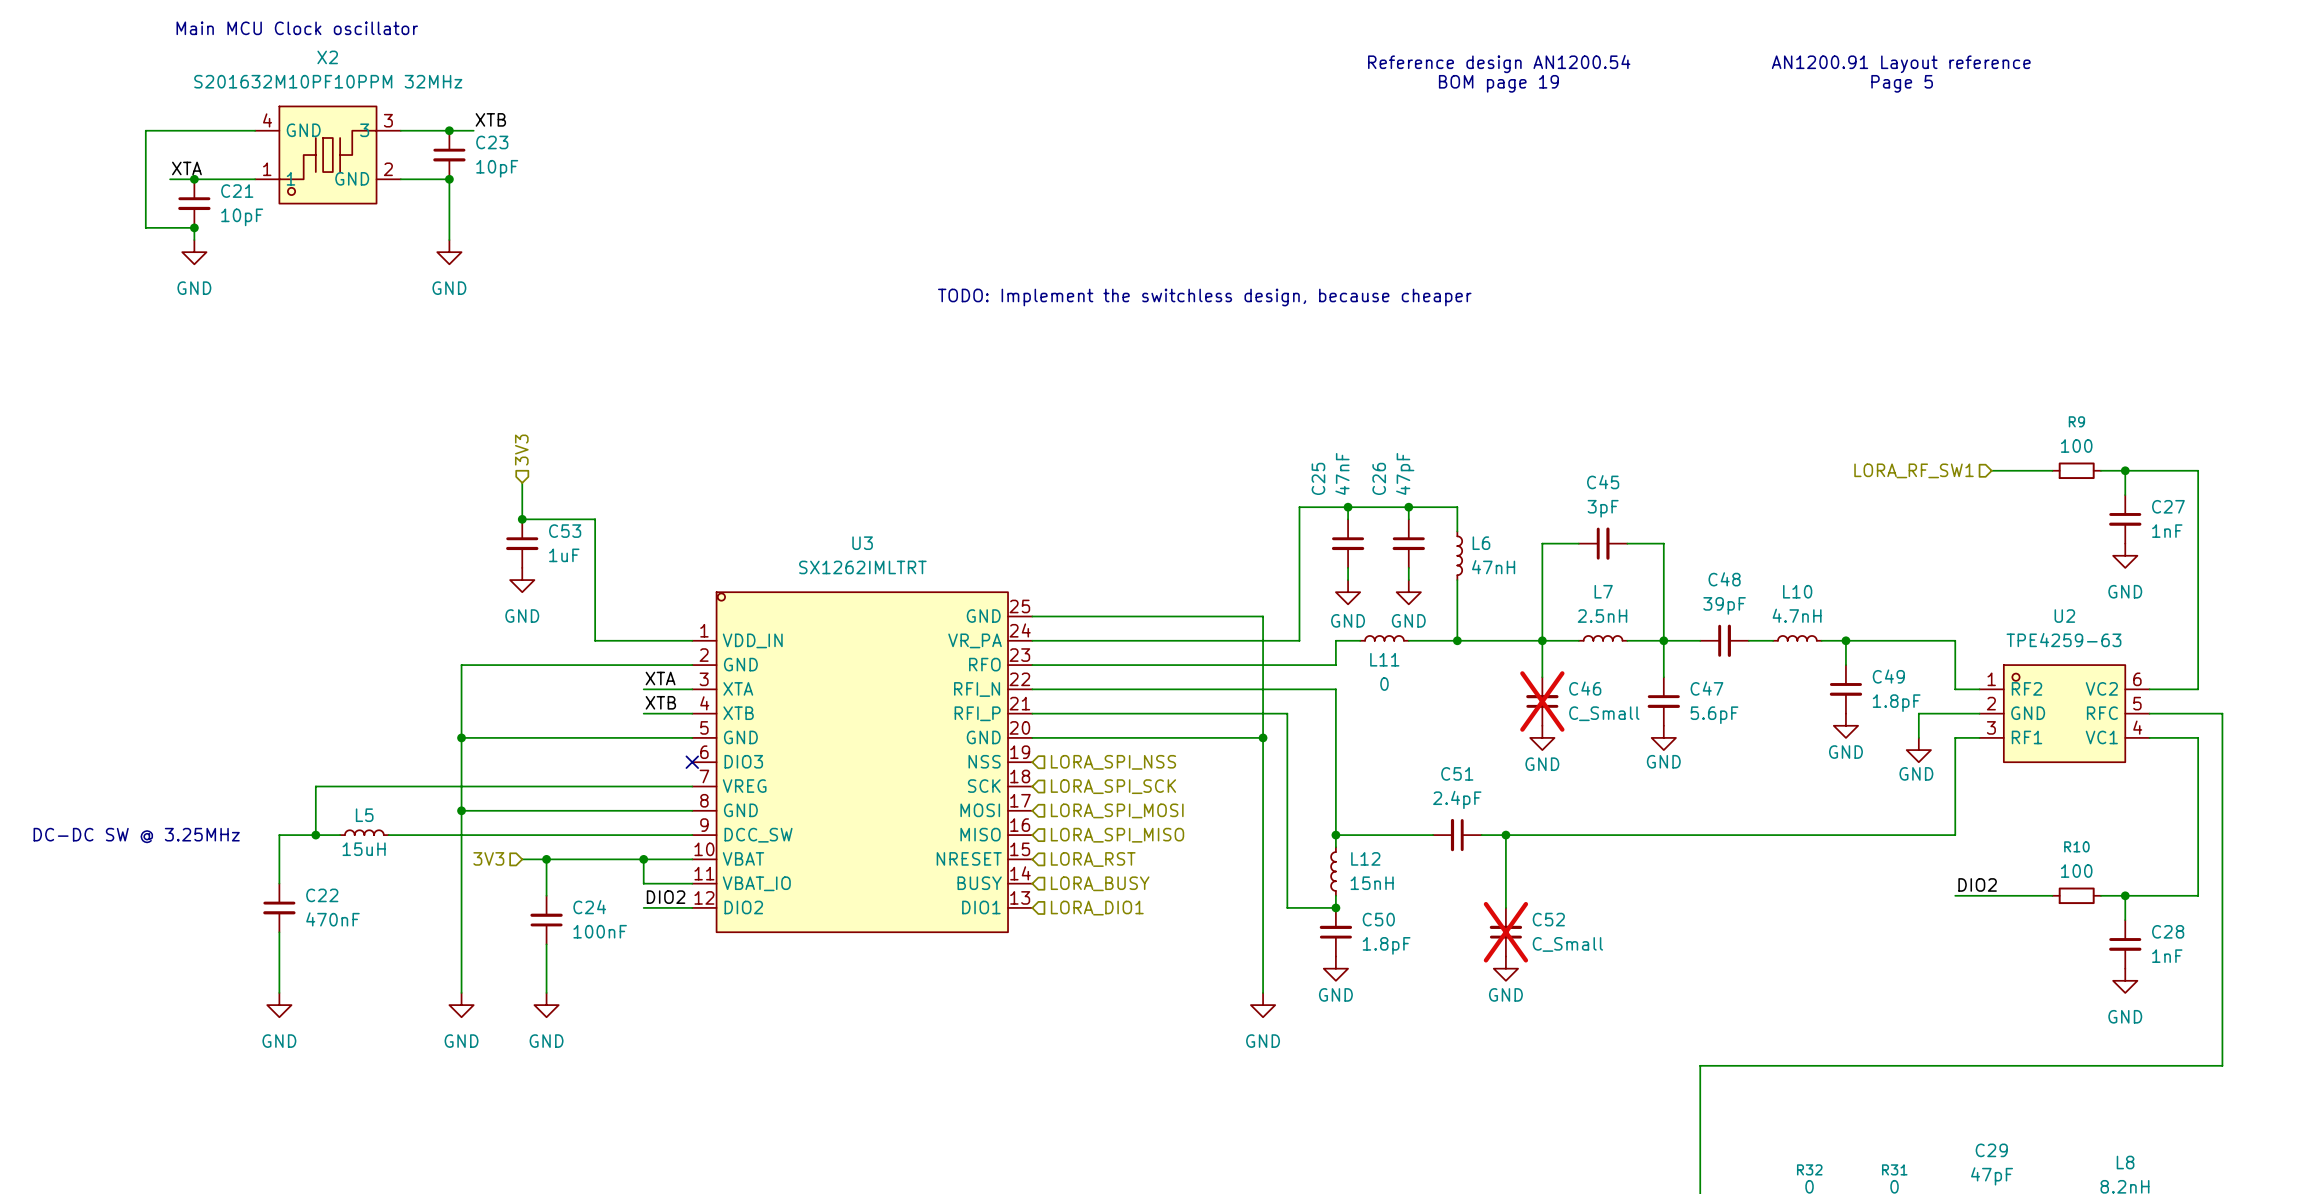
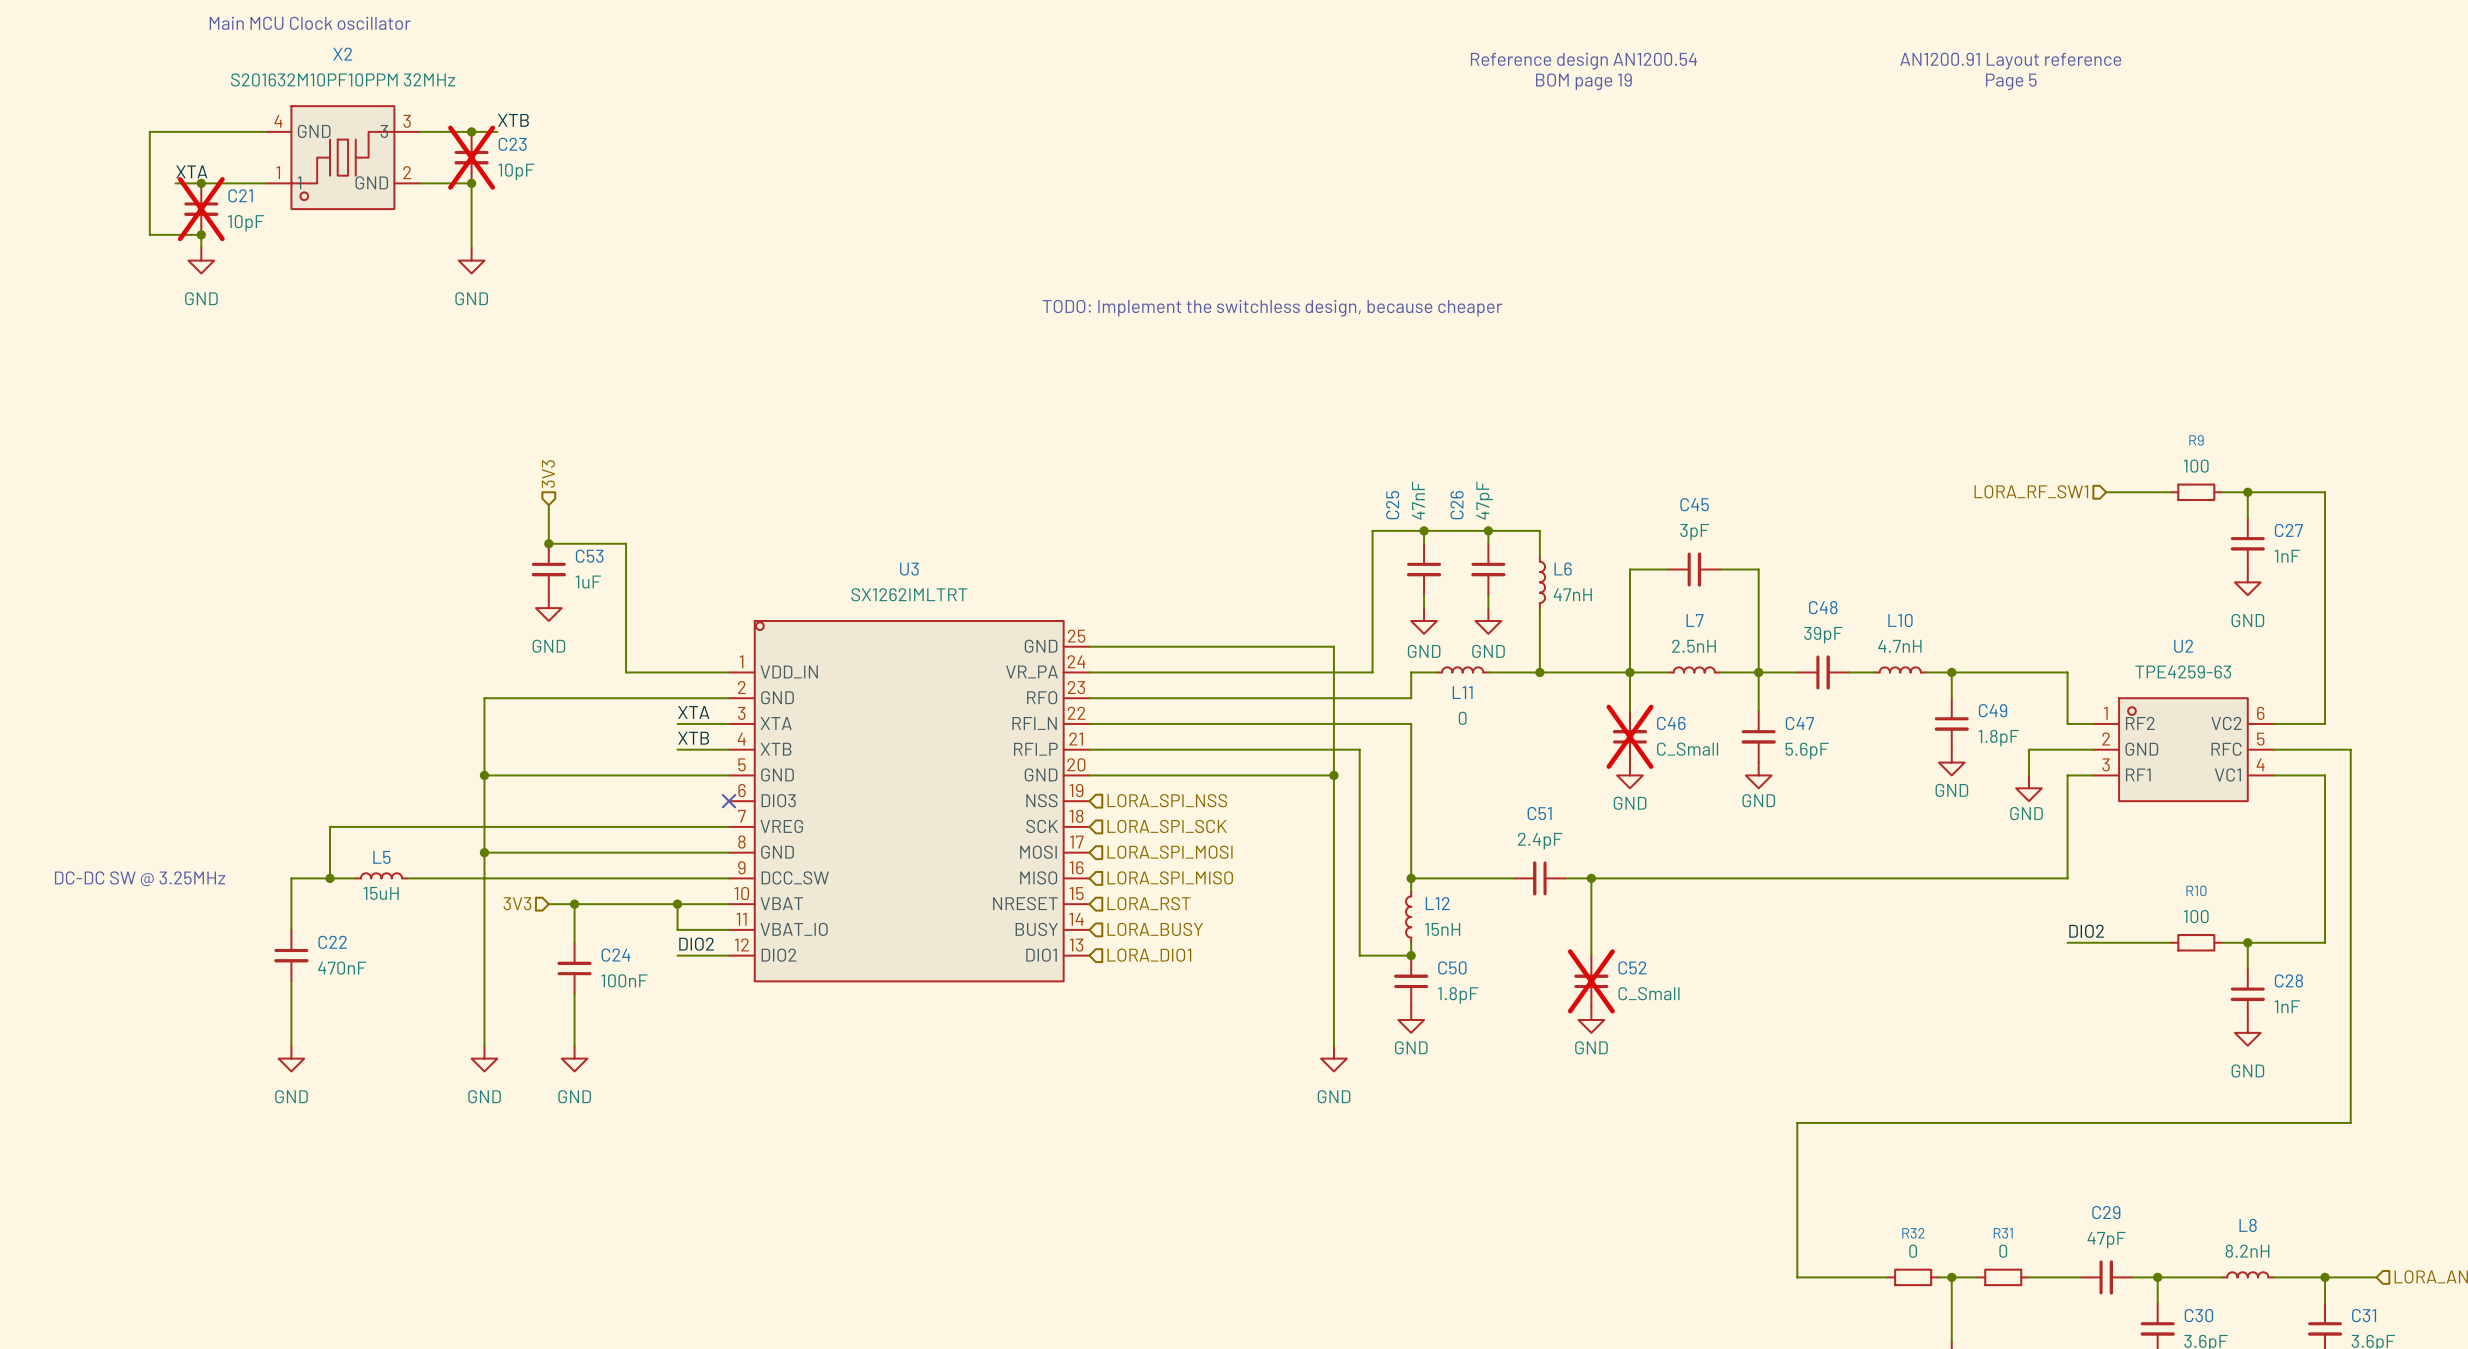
C23 do-not-place cross: none -> (471, 157)
C21 do-not-place cross: none -> (201, 209)

